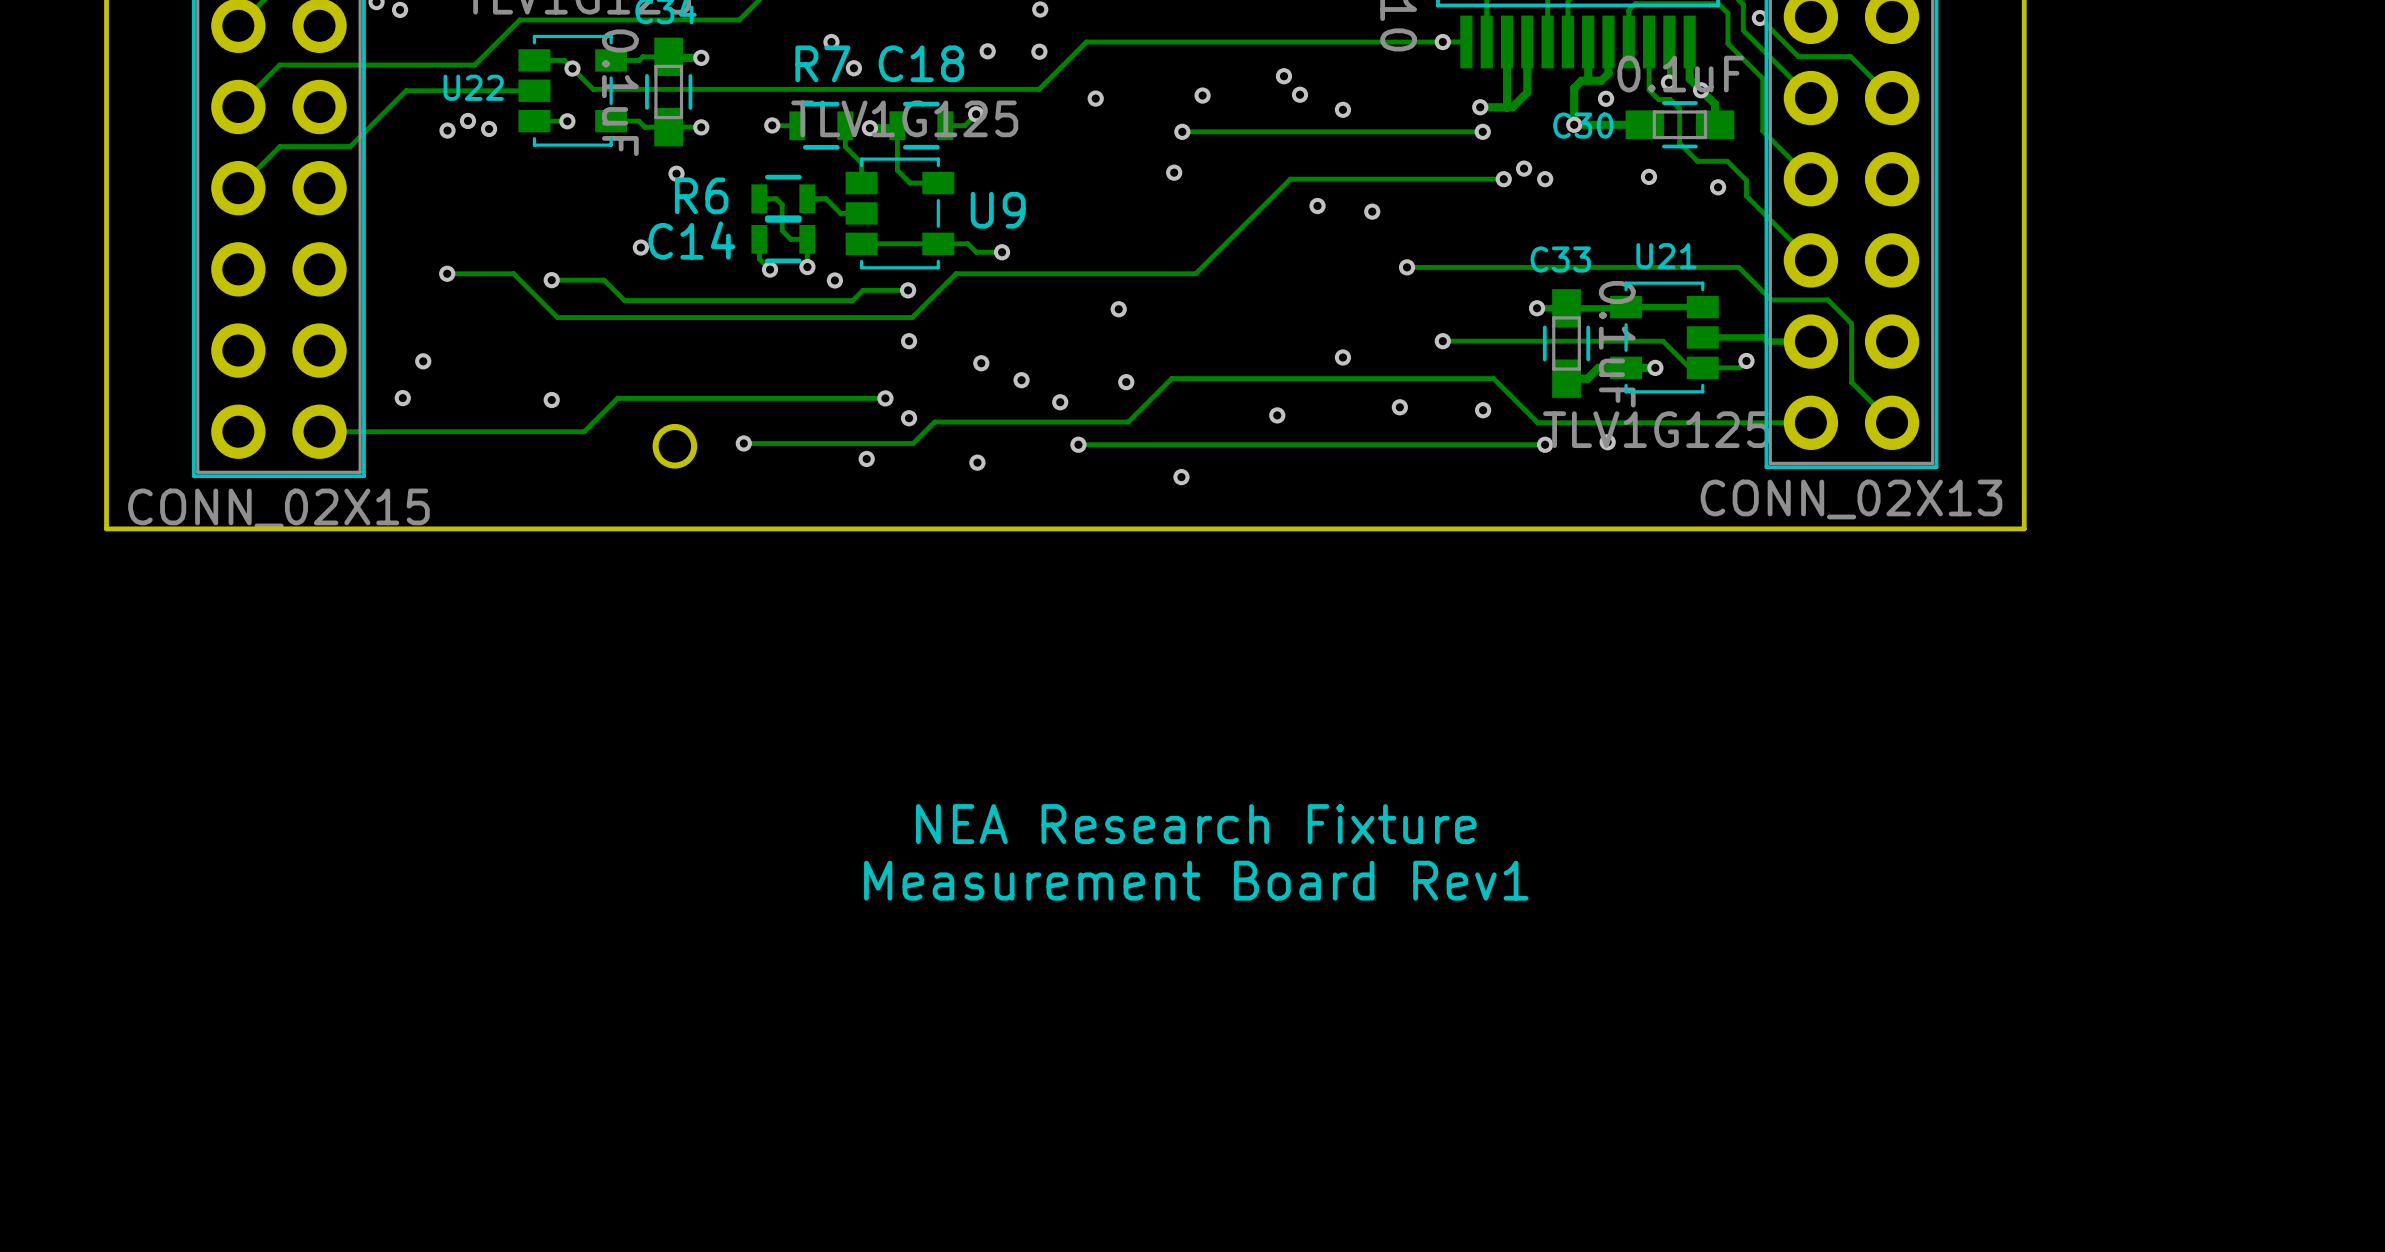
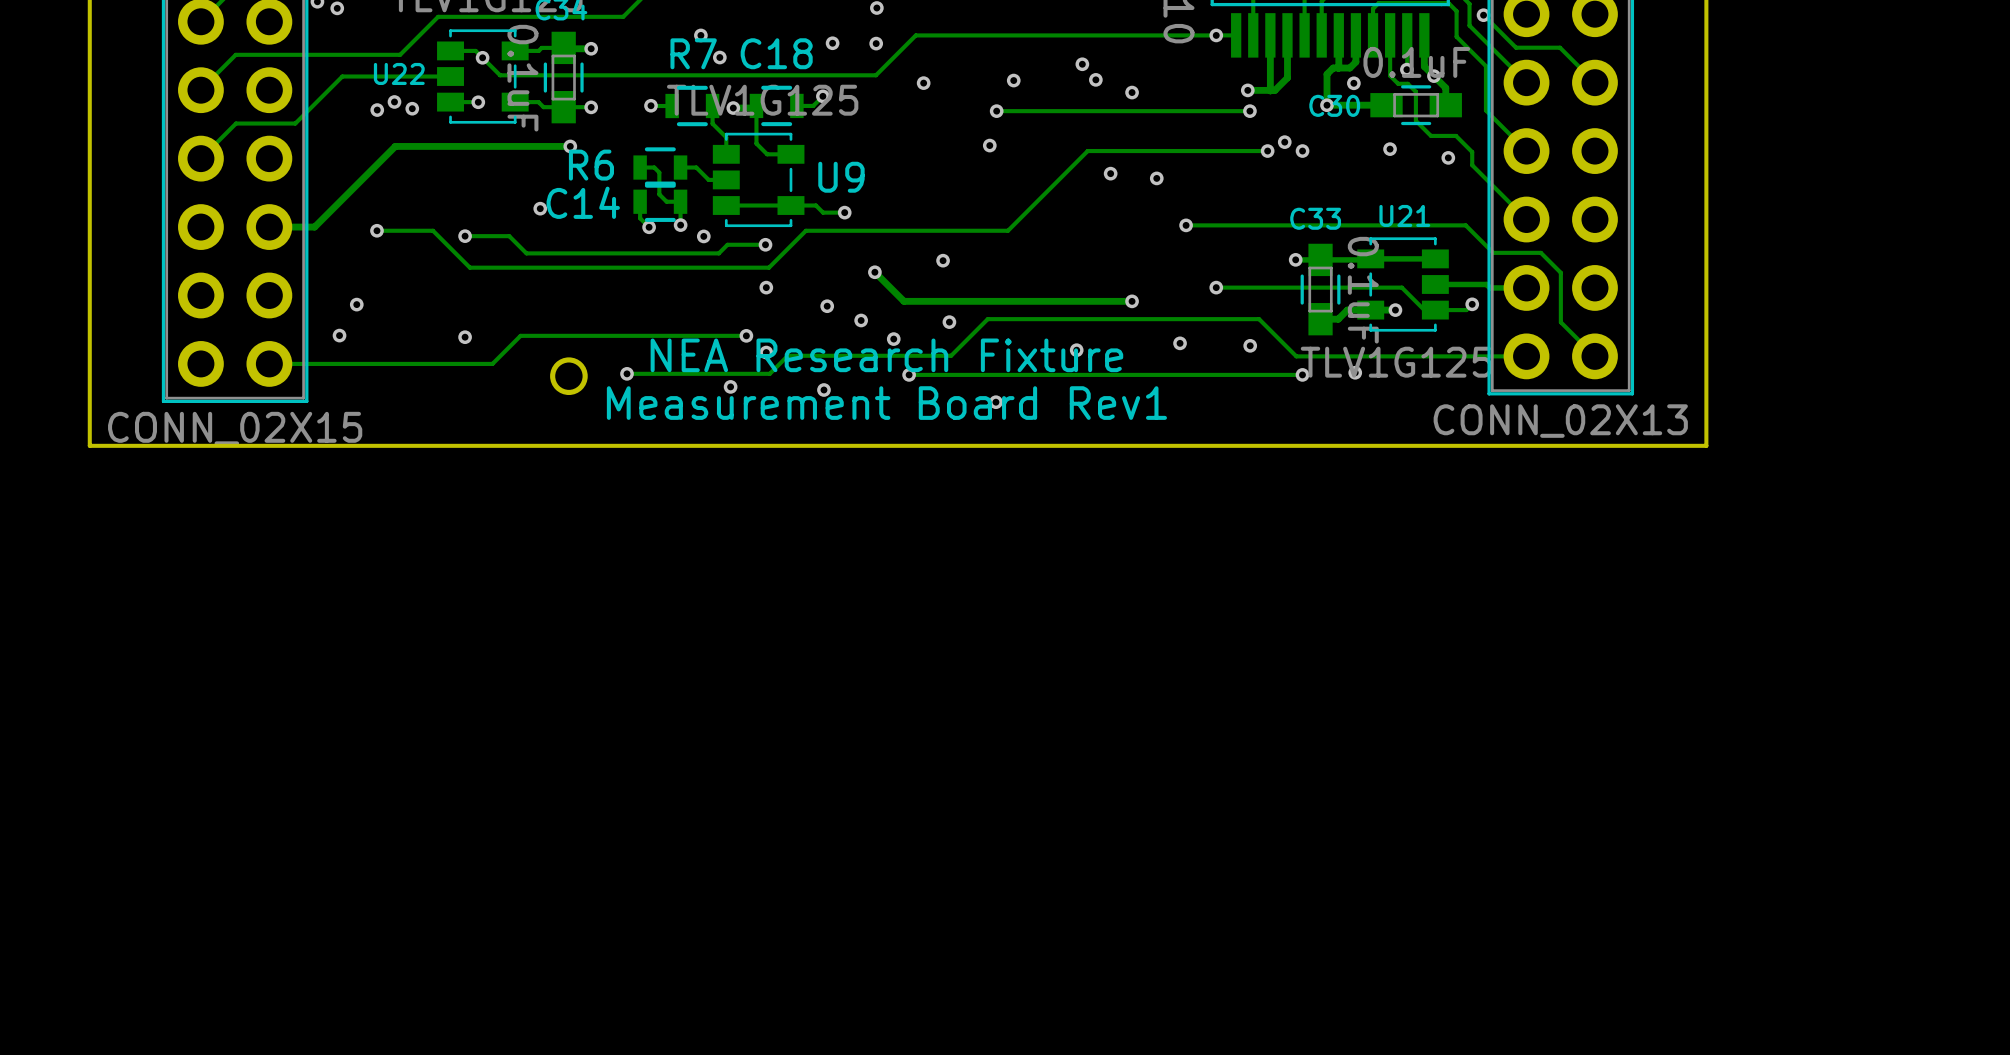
track: none -> (570, 146) (395, 146) (314, 227) (269, 227)
track: none -> (874, 272) (904, 301) (1132, 301)
via: none -> (874, 272)
text position: NEA Research Fixture (1196, 824) -> NEA Research Fixture (886, 355)
text position: Measurement Board Rev1 (1196, 880) -> Measurement Board Rev1 (886, 403)

